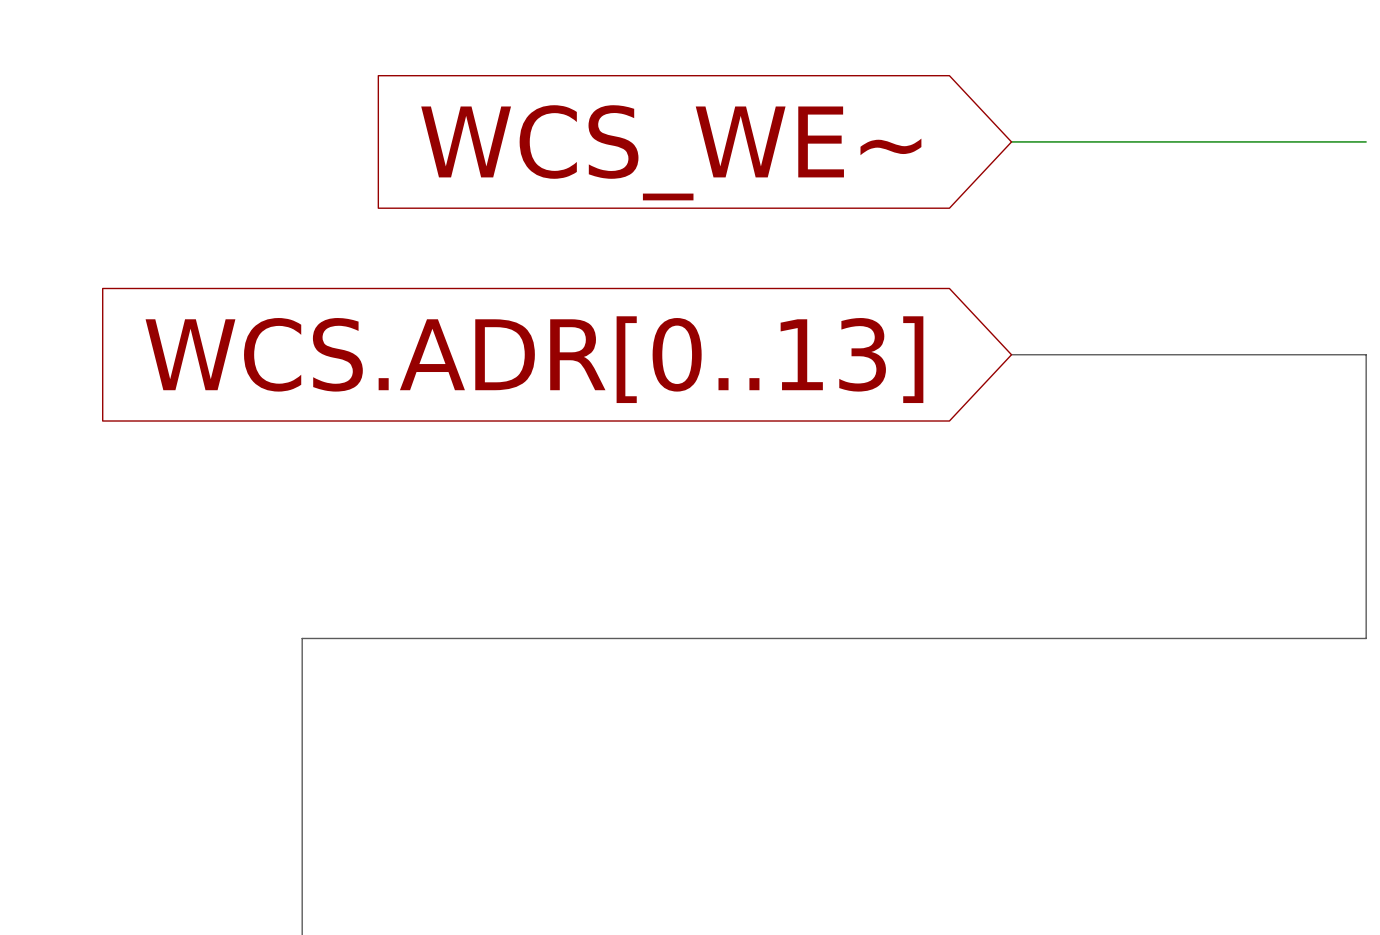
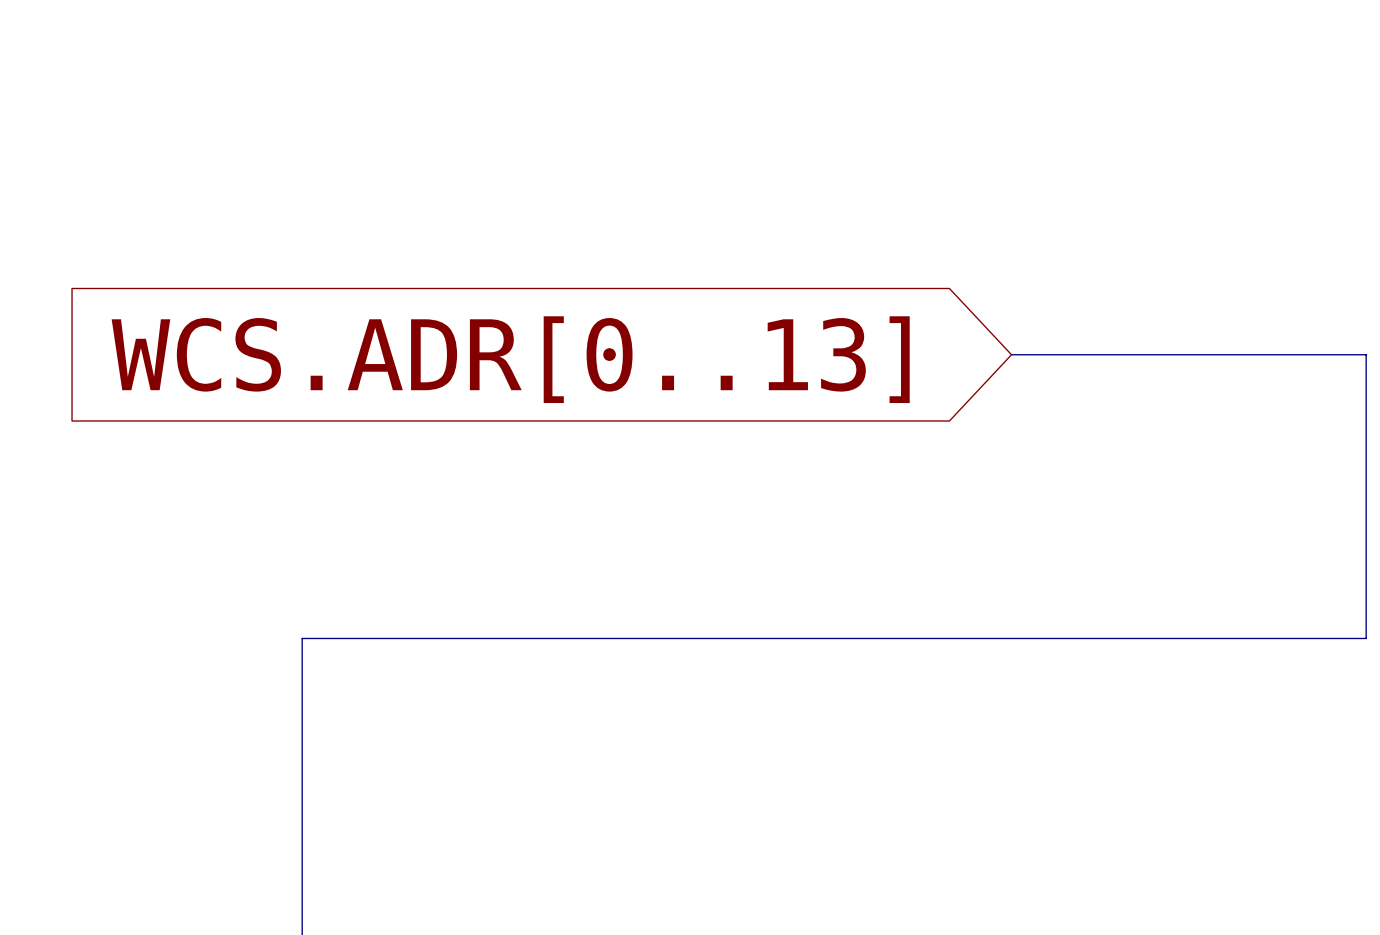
wire: (1011, 141) (1366, 141) -> none
global label: WCS_WE~ (671, 152) -> none

